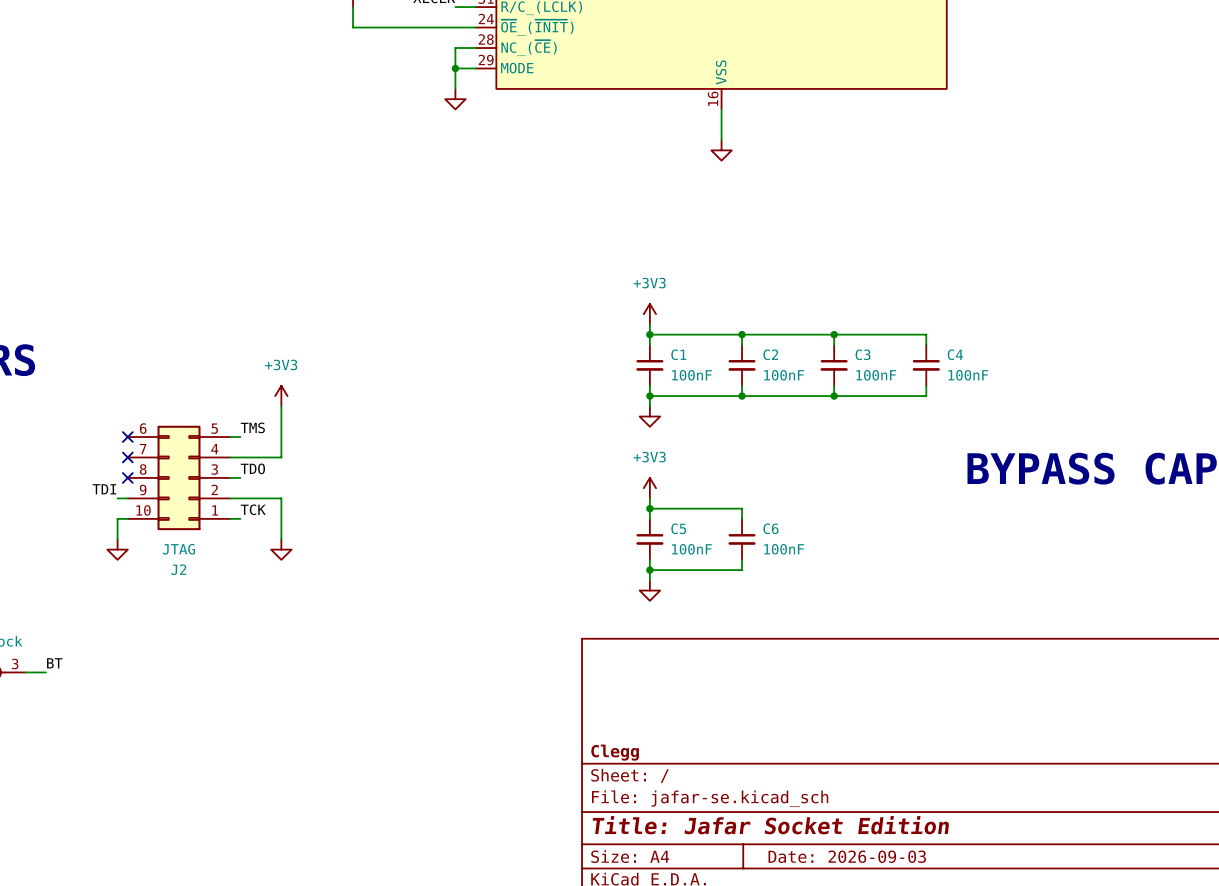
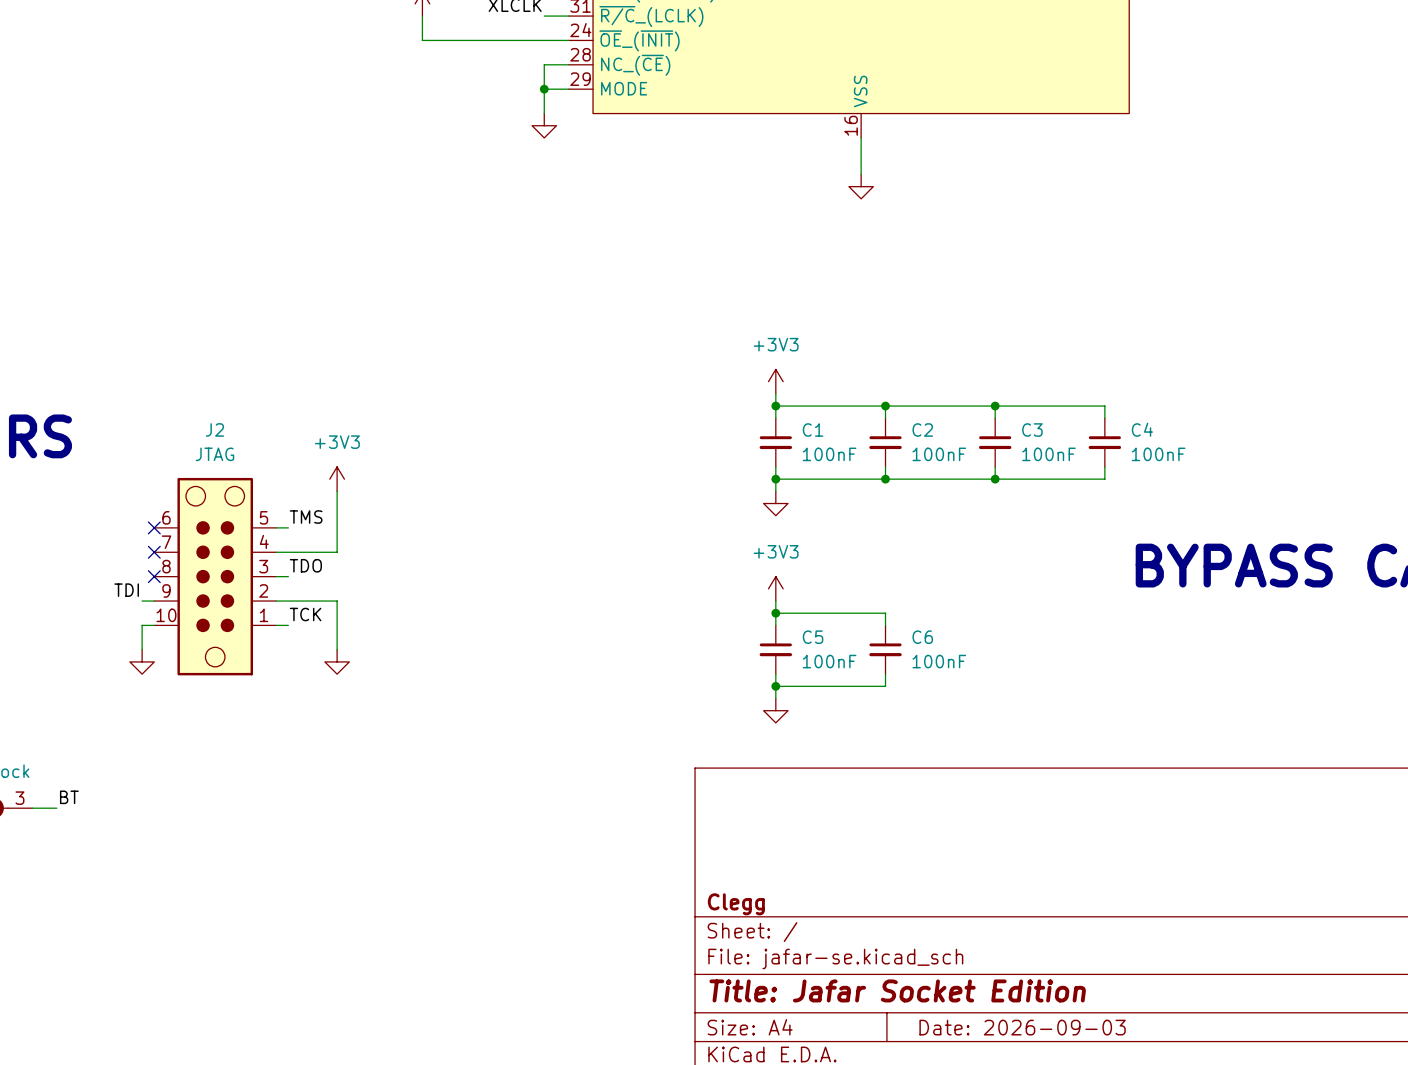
J2 symbol: [127, 425, 231, 531] -> [154, 477, 277, 676]
J2 value position: JTAG (178, 549) -> JTAG (214, 454)
J2 name position: J2 (178, 569) -> J2 (214, 429)

